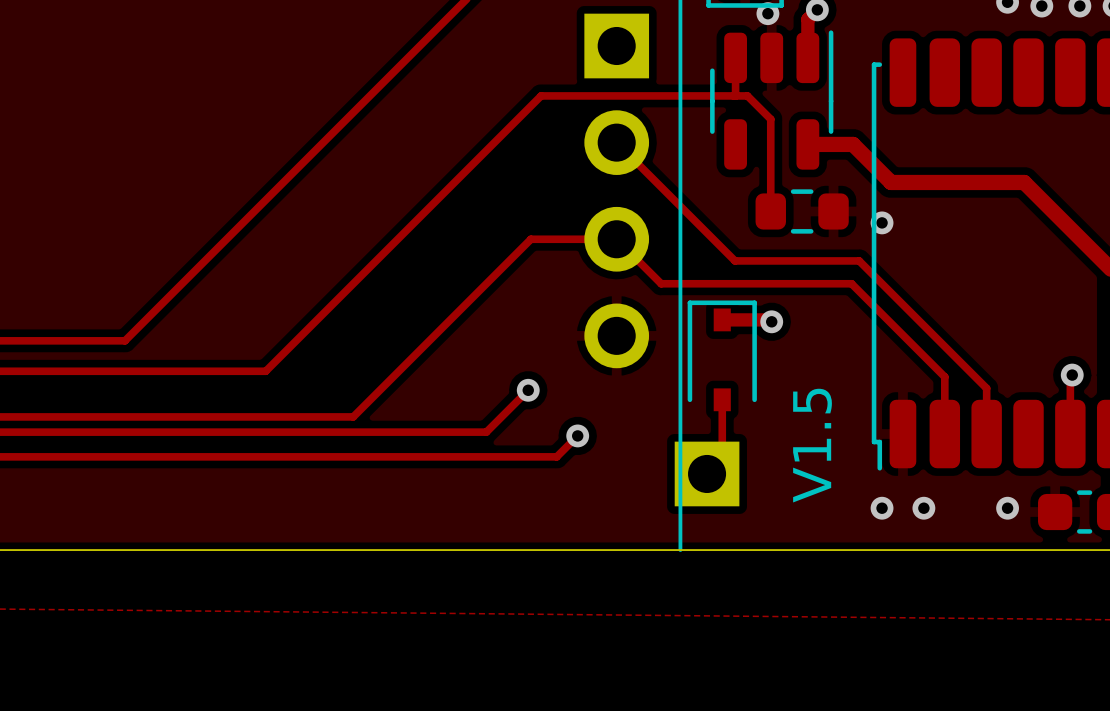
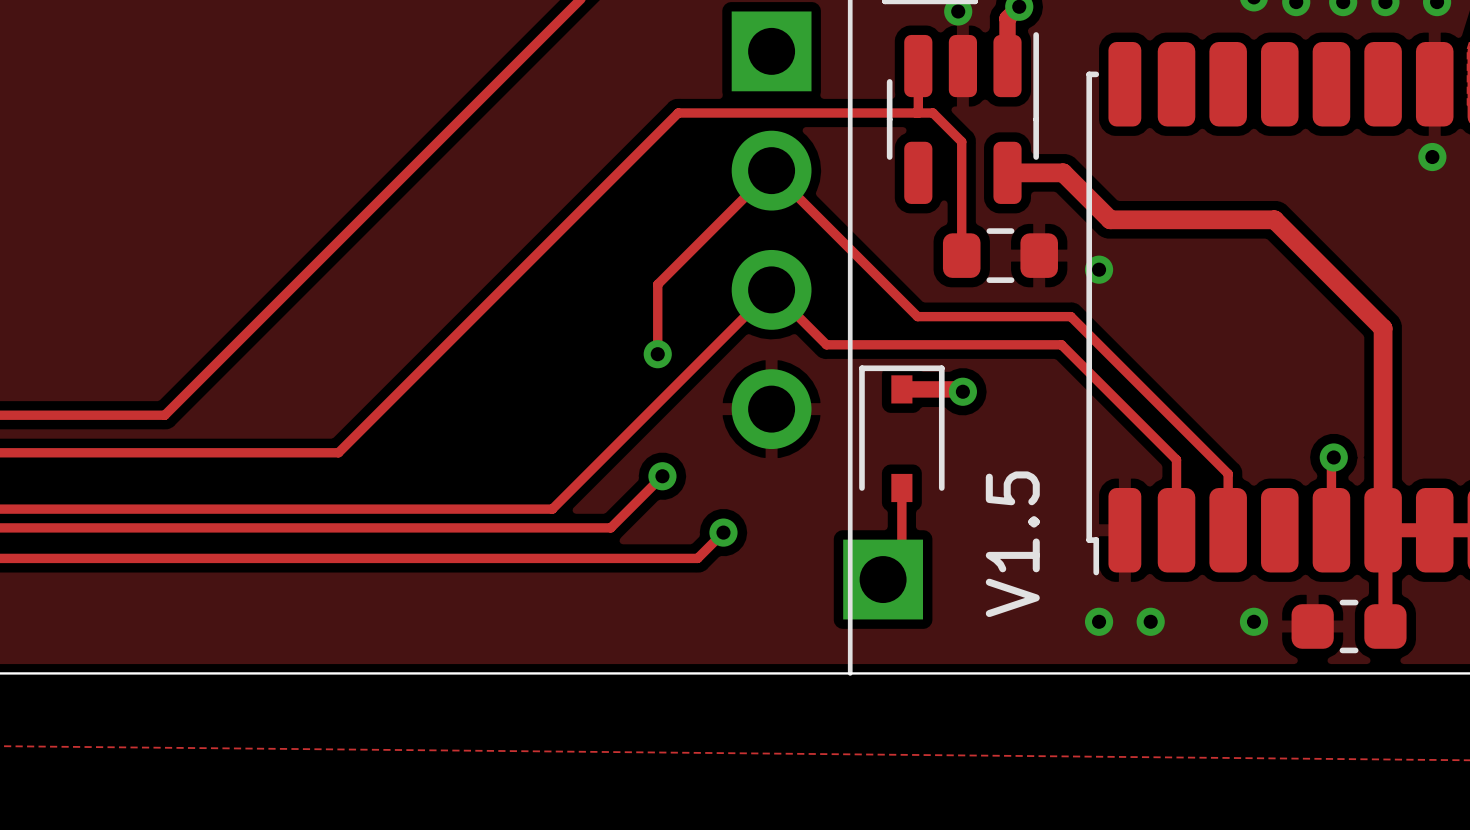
track: none -> (771, 170) (657, 284) (657, 354)
track: (616, 239) (530, 239) (353, 416) -> (771, 289) (552, 509) (446, 509)
via: none -> (657, 354)

